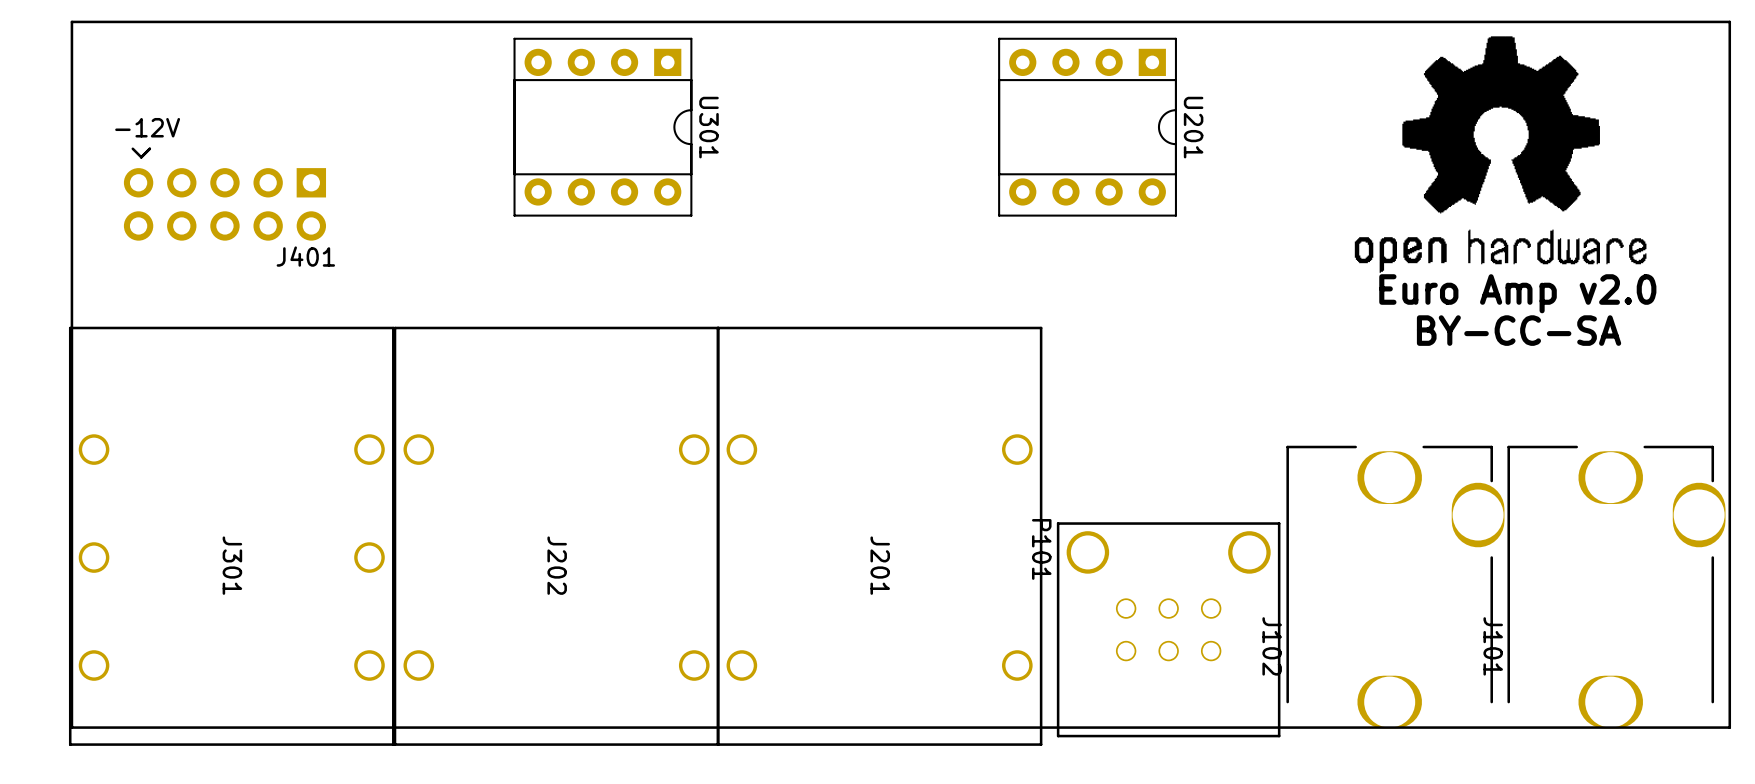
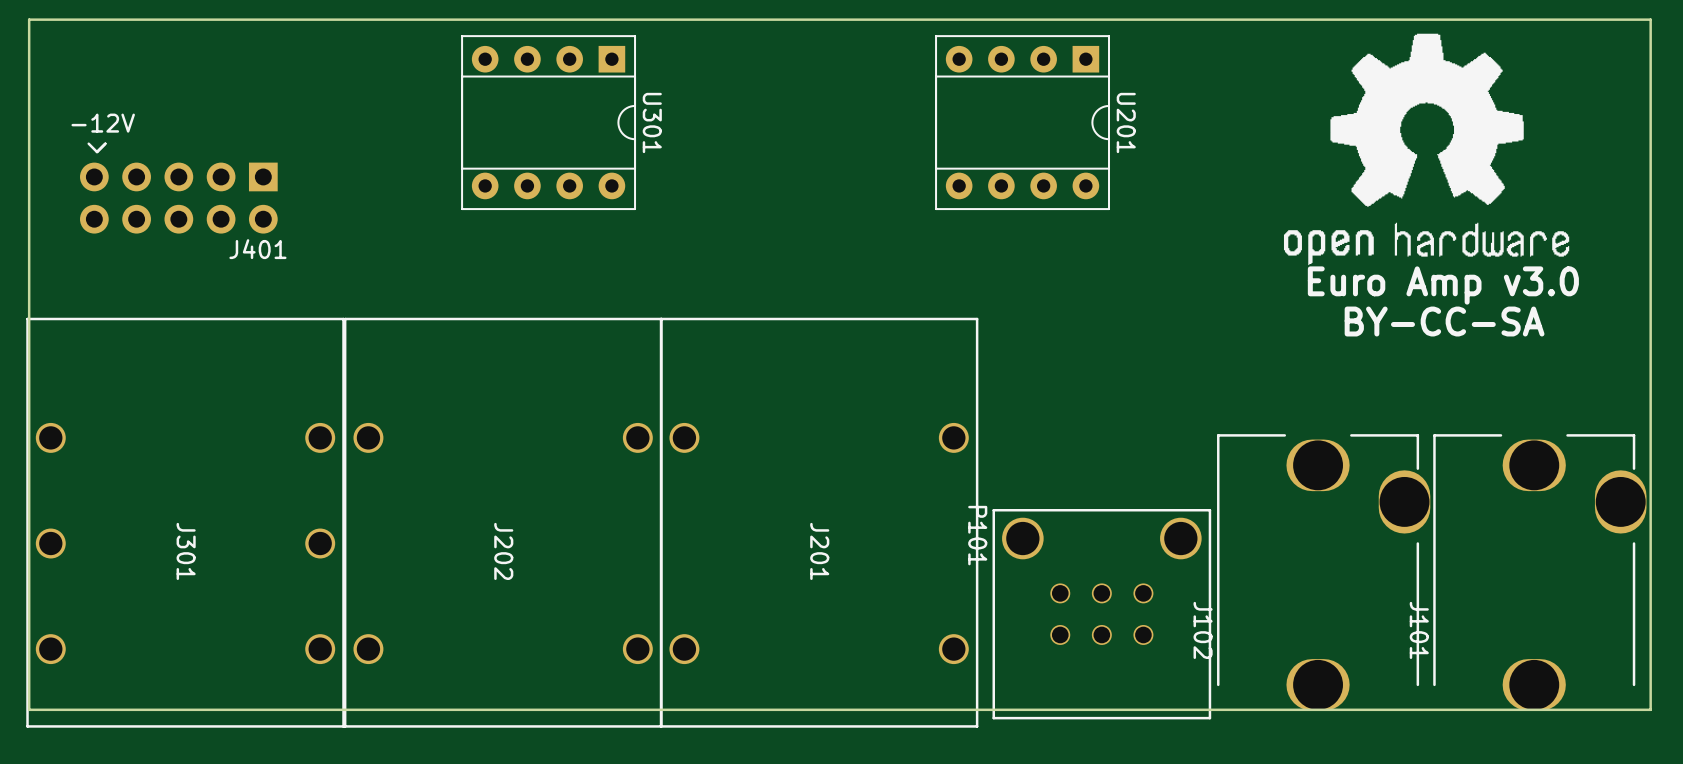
text: Euro Amp v2.0 (1517, 293) -> Euro Amp v3.0 (1443, 285)

